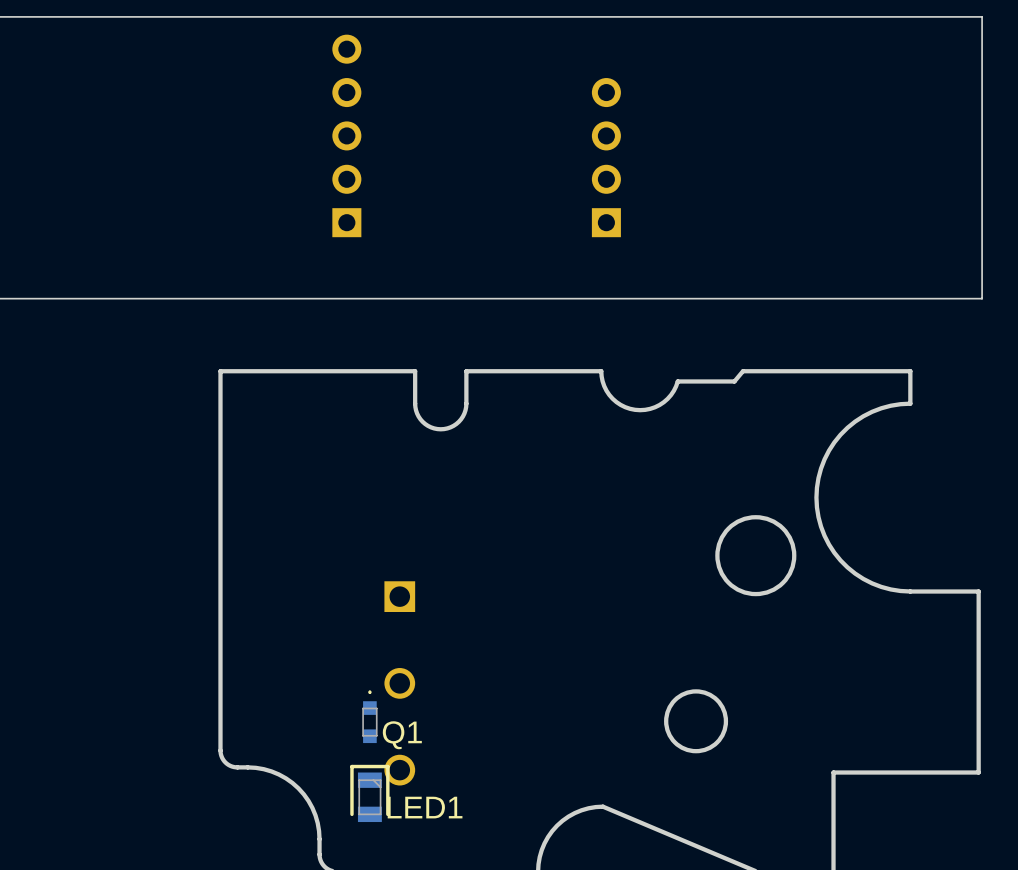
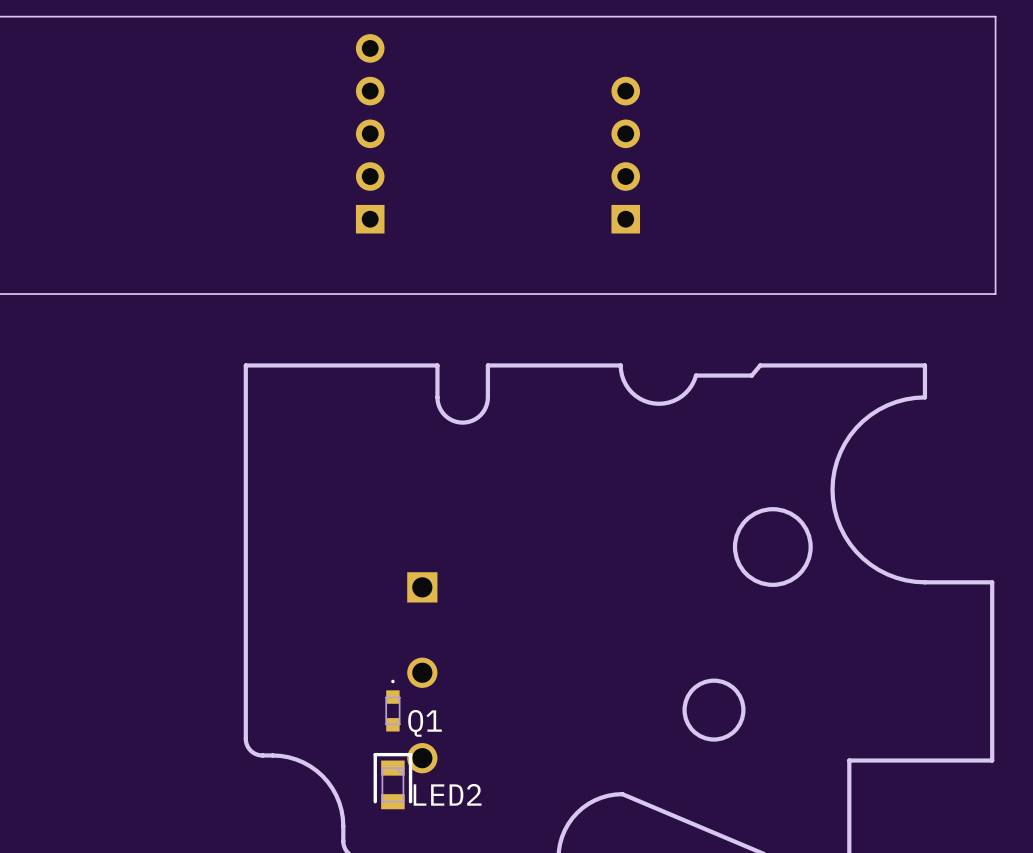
LED1 name: LED1 (425, 807) -> LED2 (447, 794)

